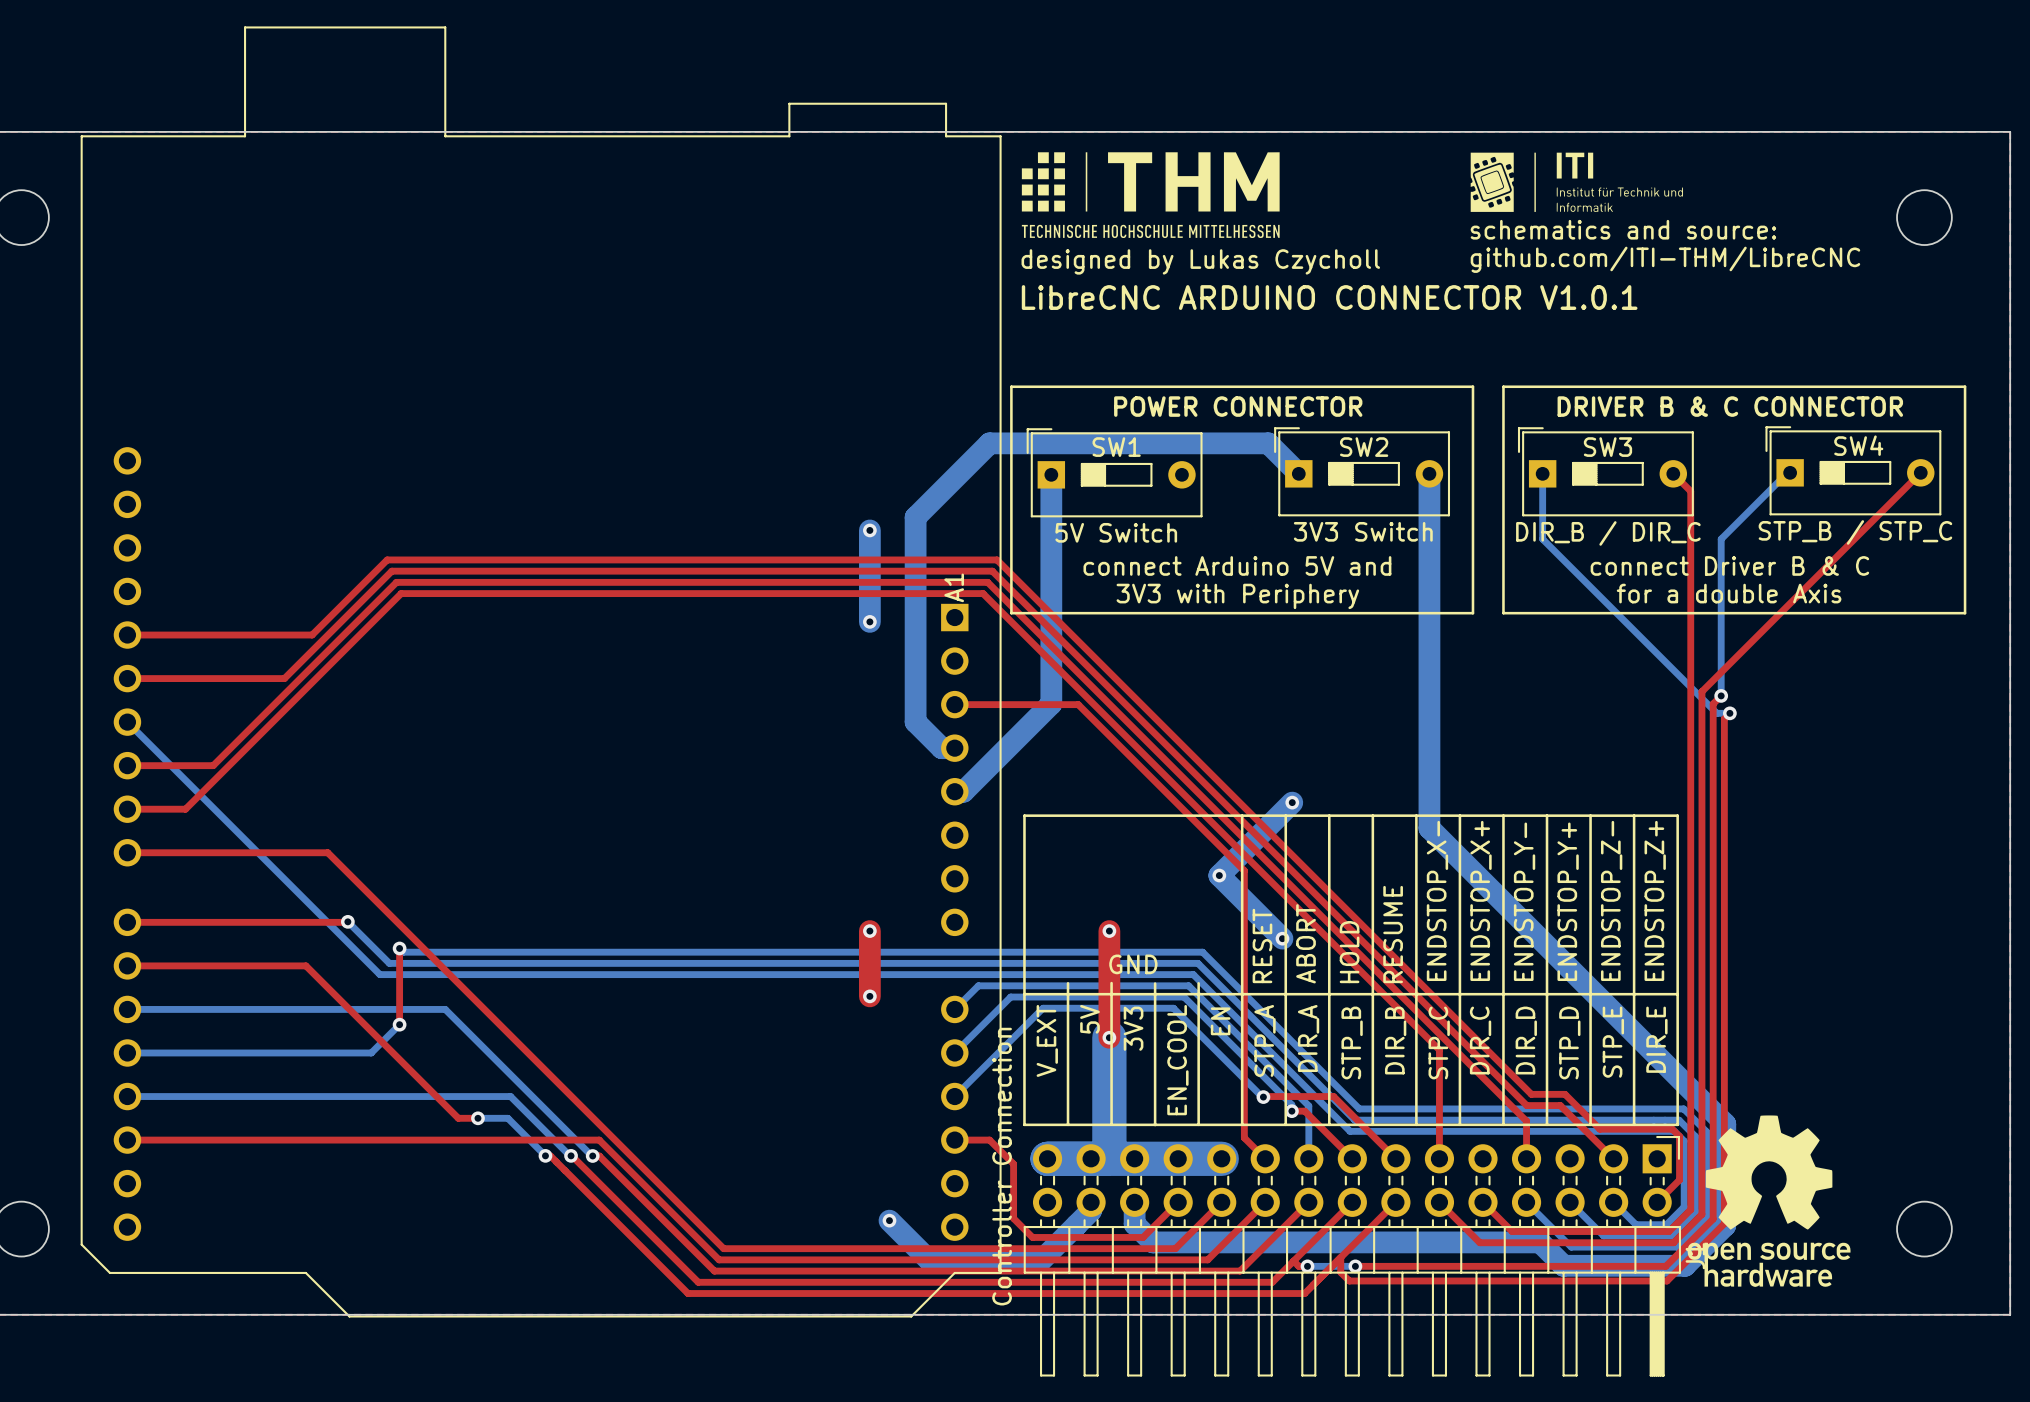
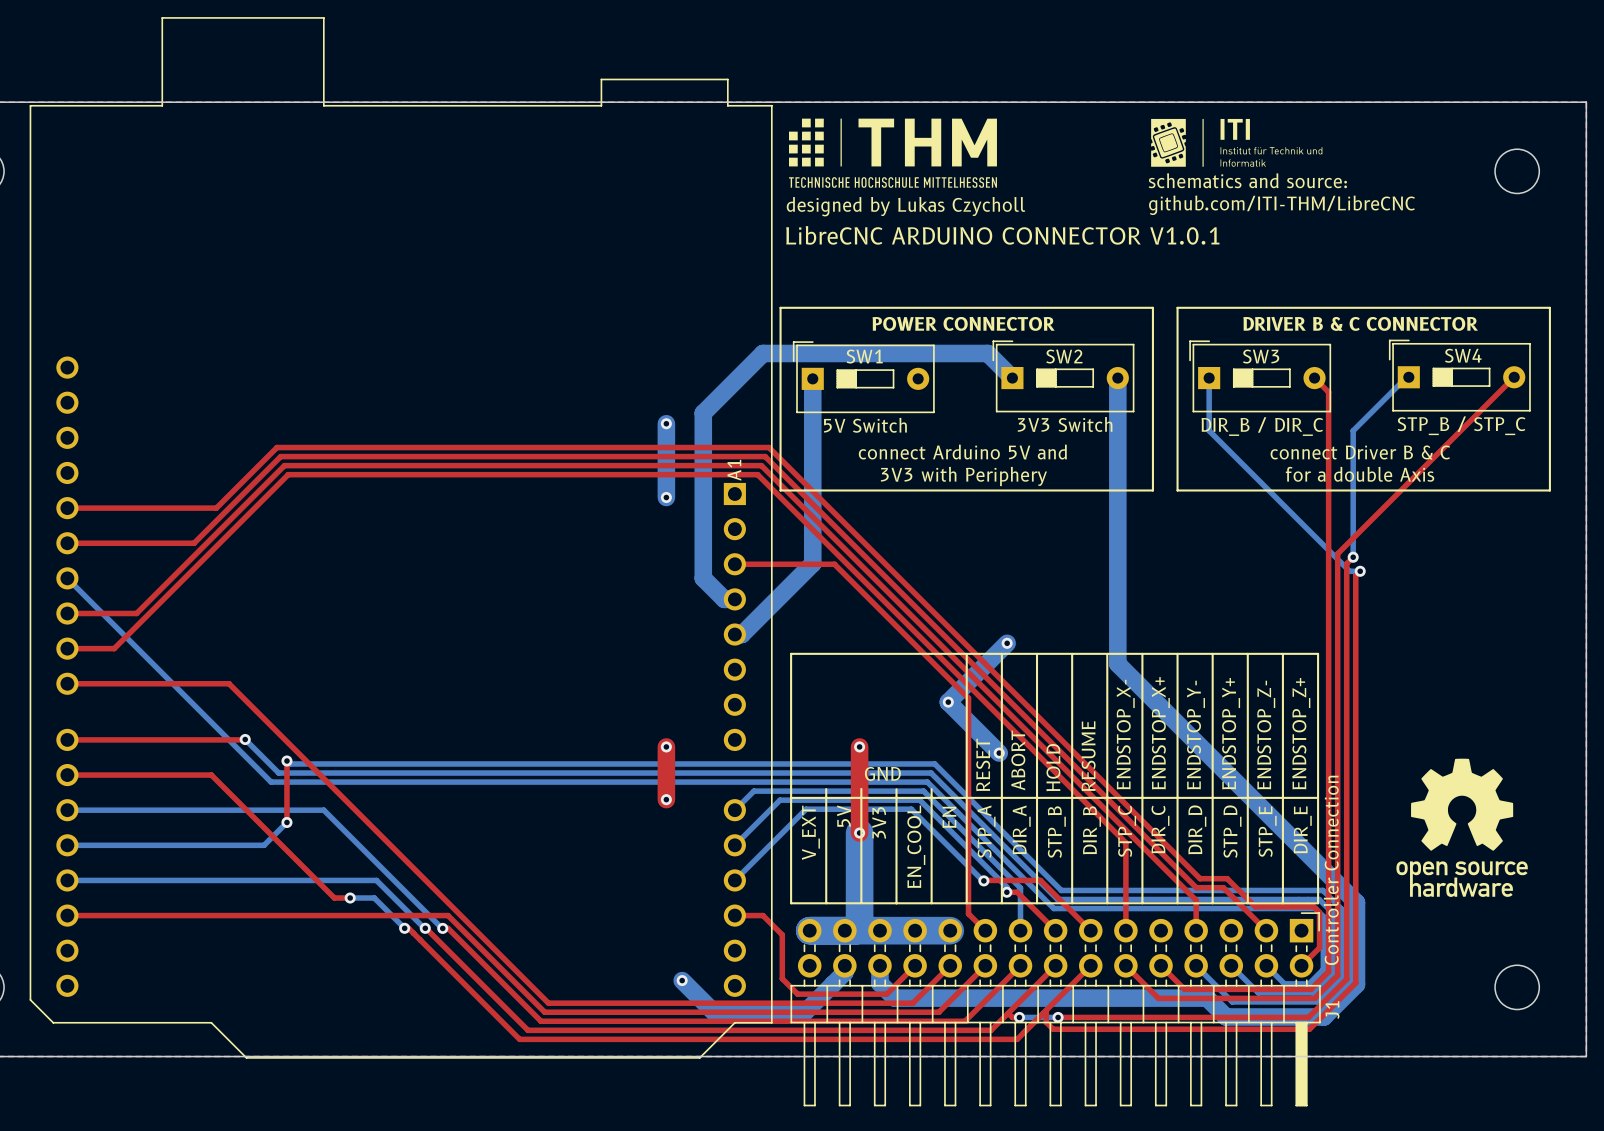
J1 value position: Controller Connection (1002, 1166) -> Controller Connection (1331, 870)
drawing position: (1769, 1201) -> (1462, 827)

